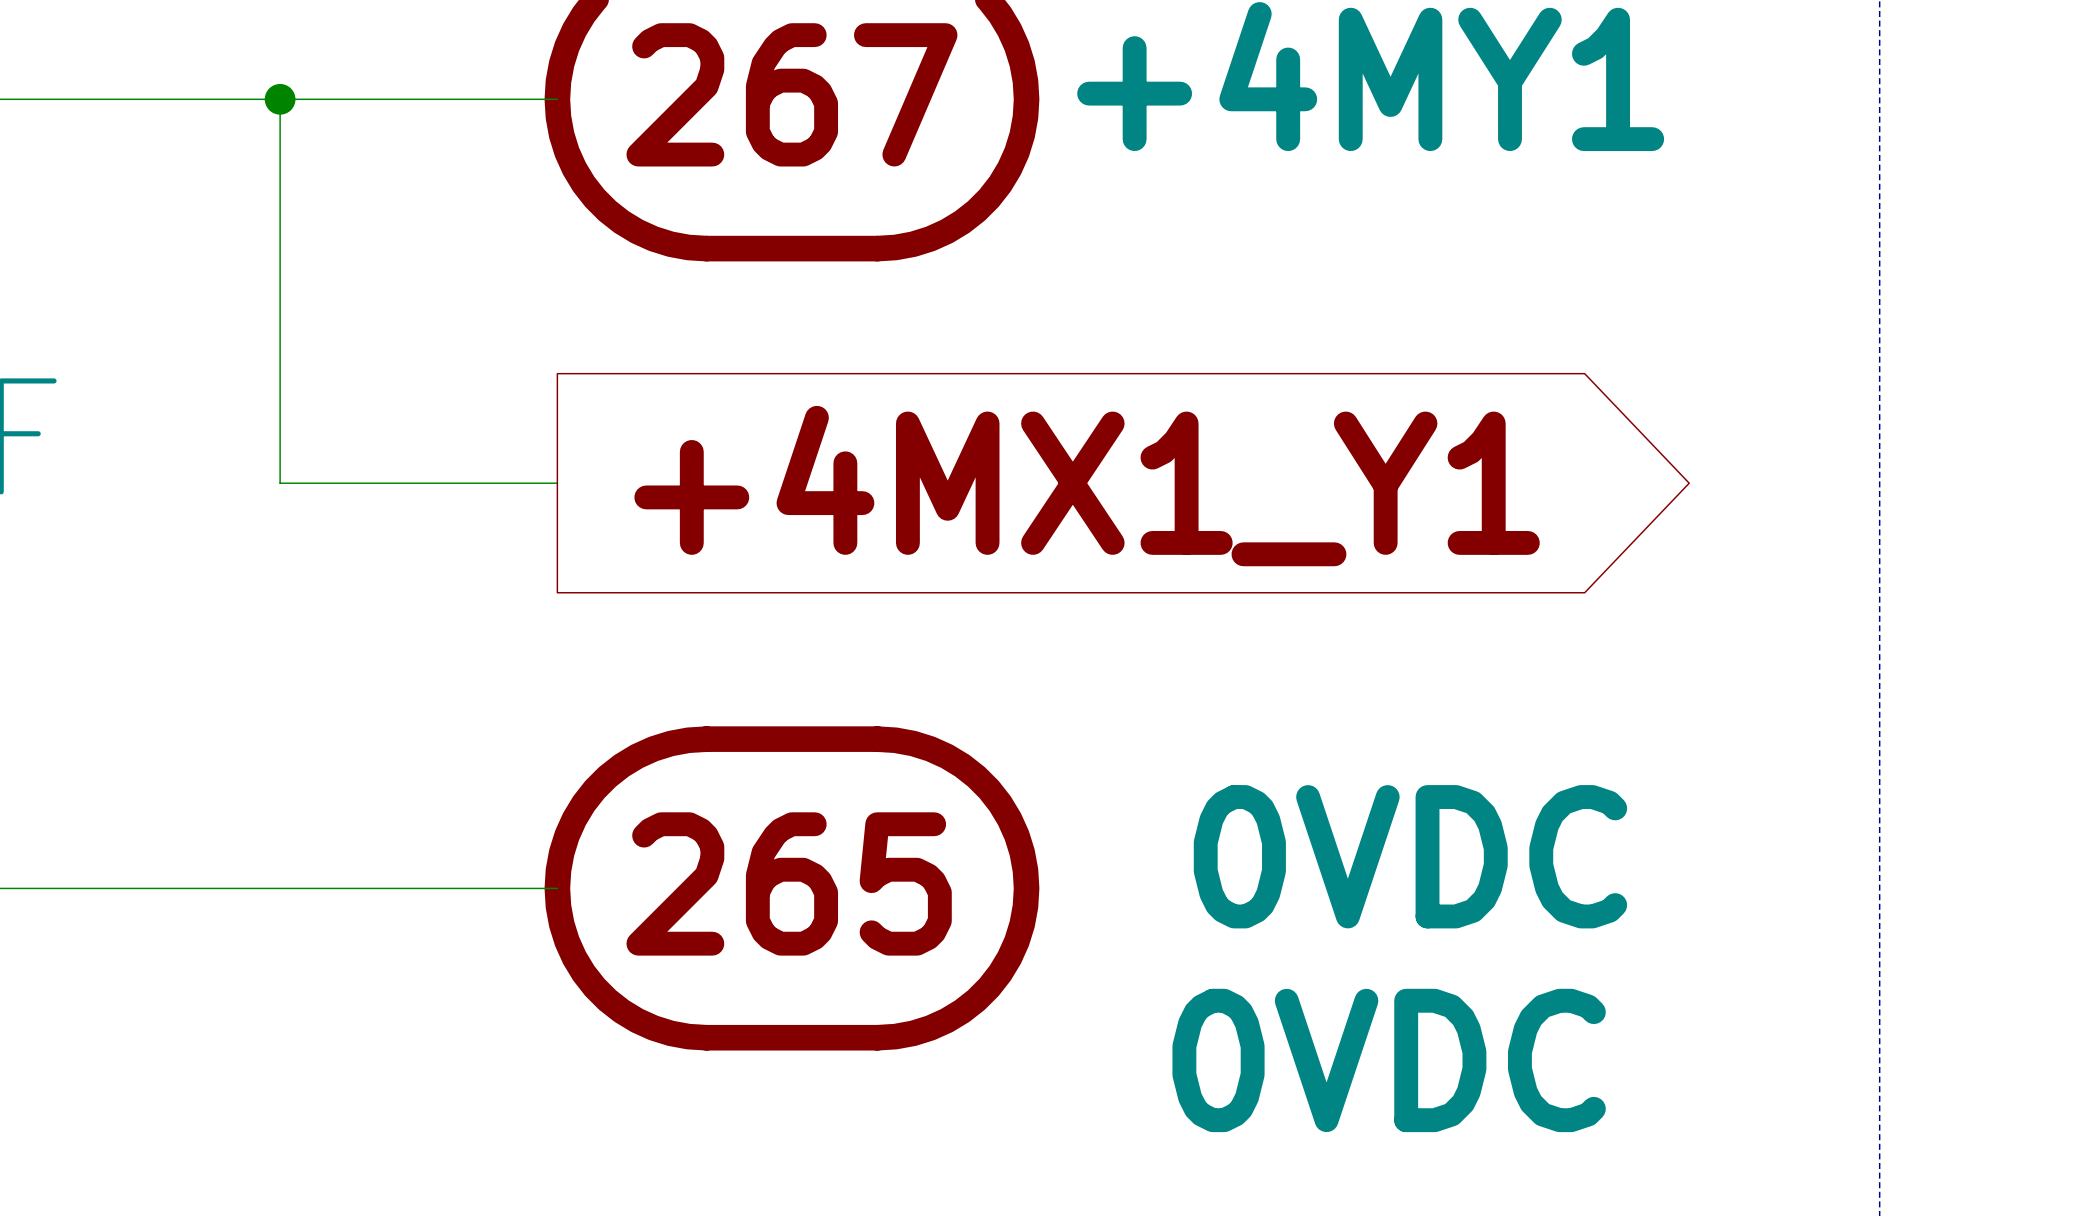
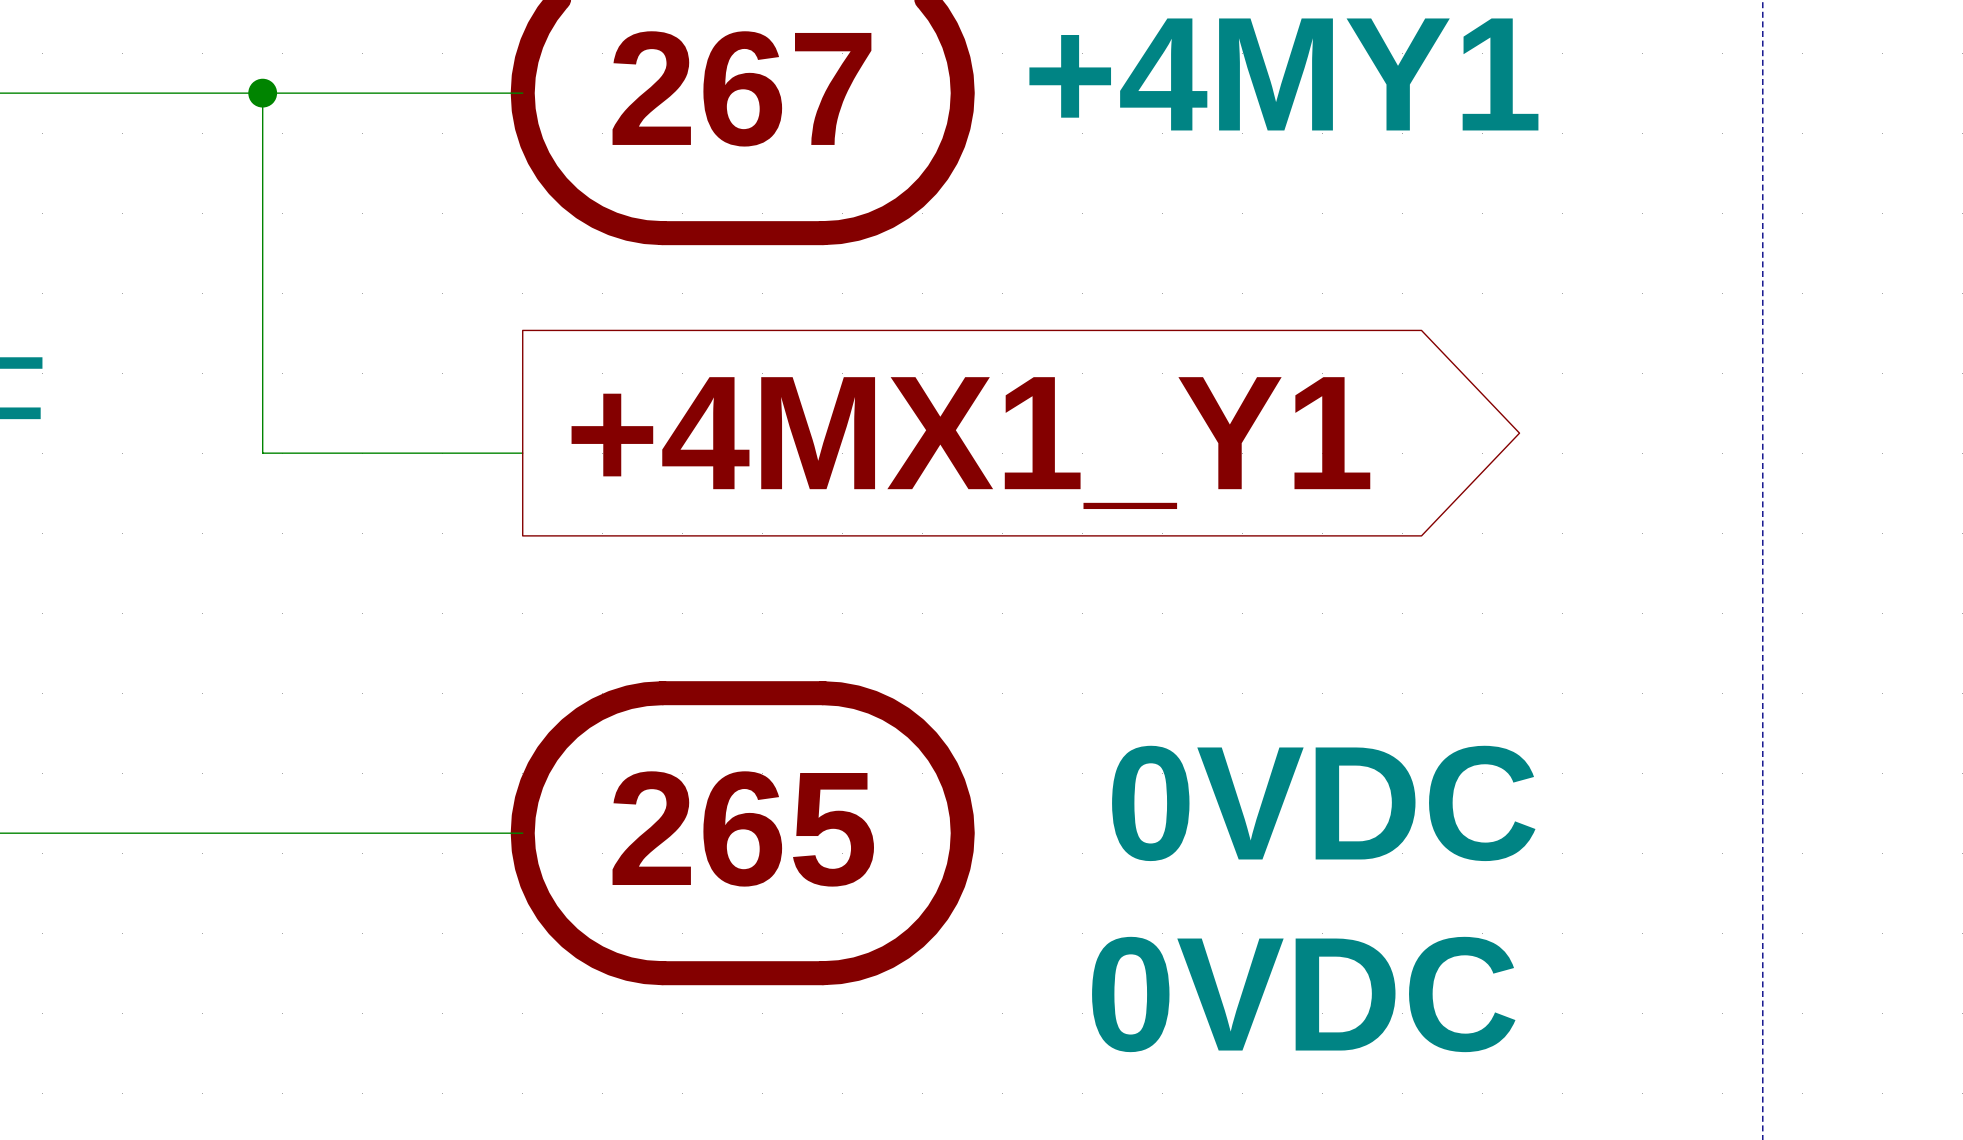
global label position: +4MX1_Y1 (1087, 486) -> +4MX1_Y1 (970, 443)

